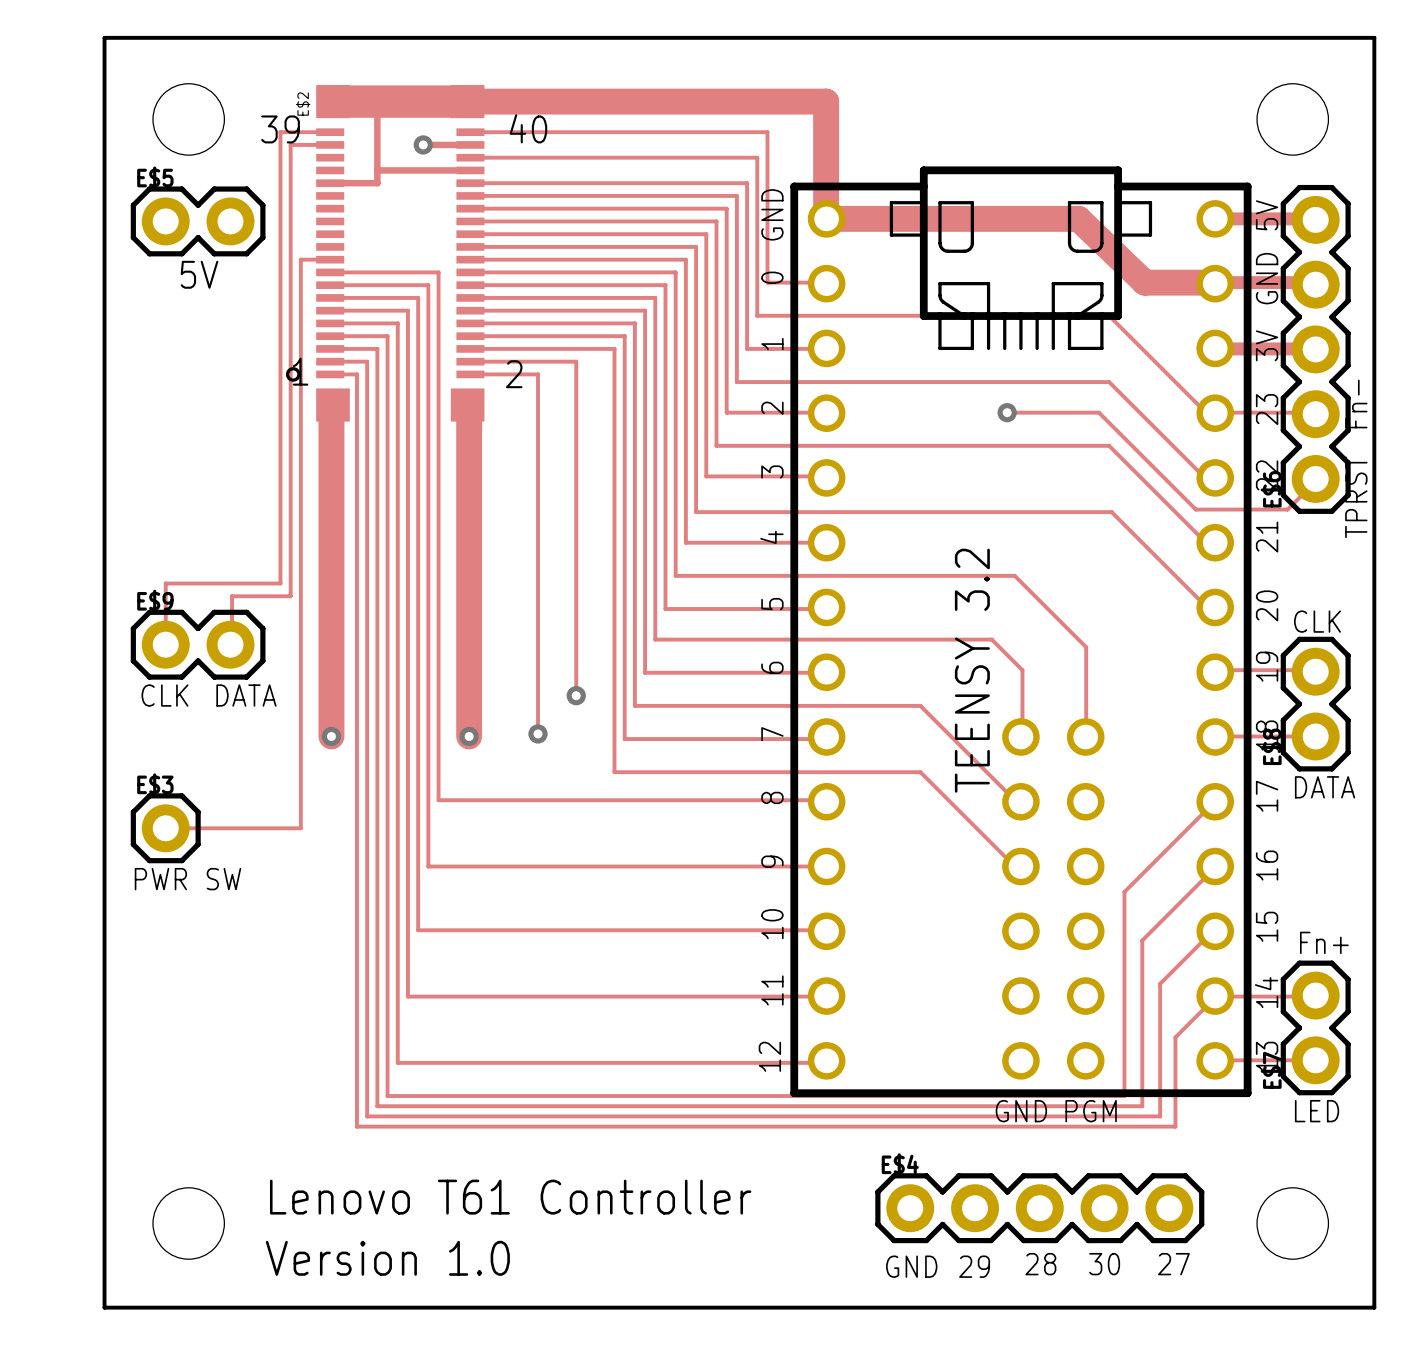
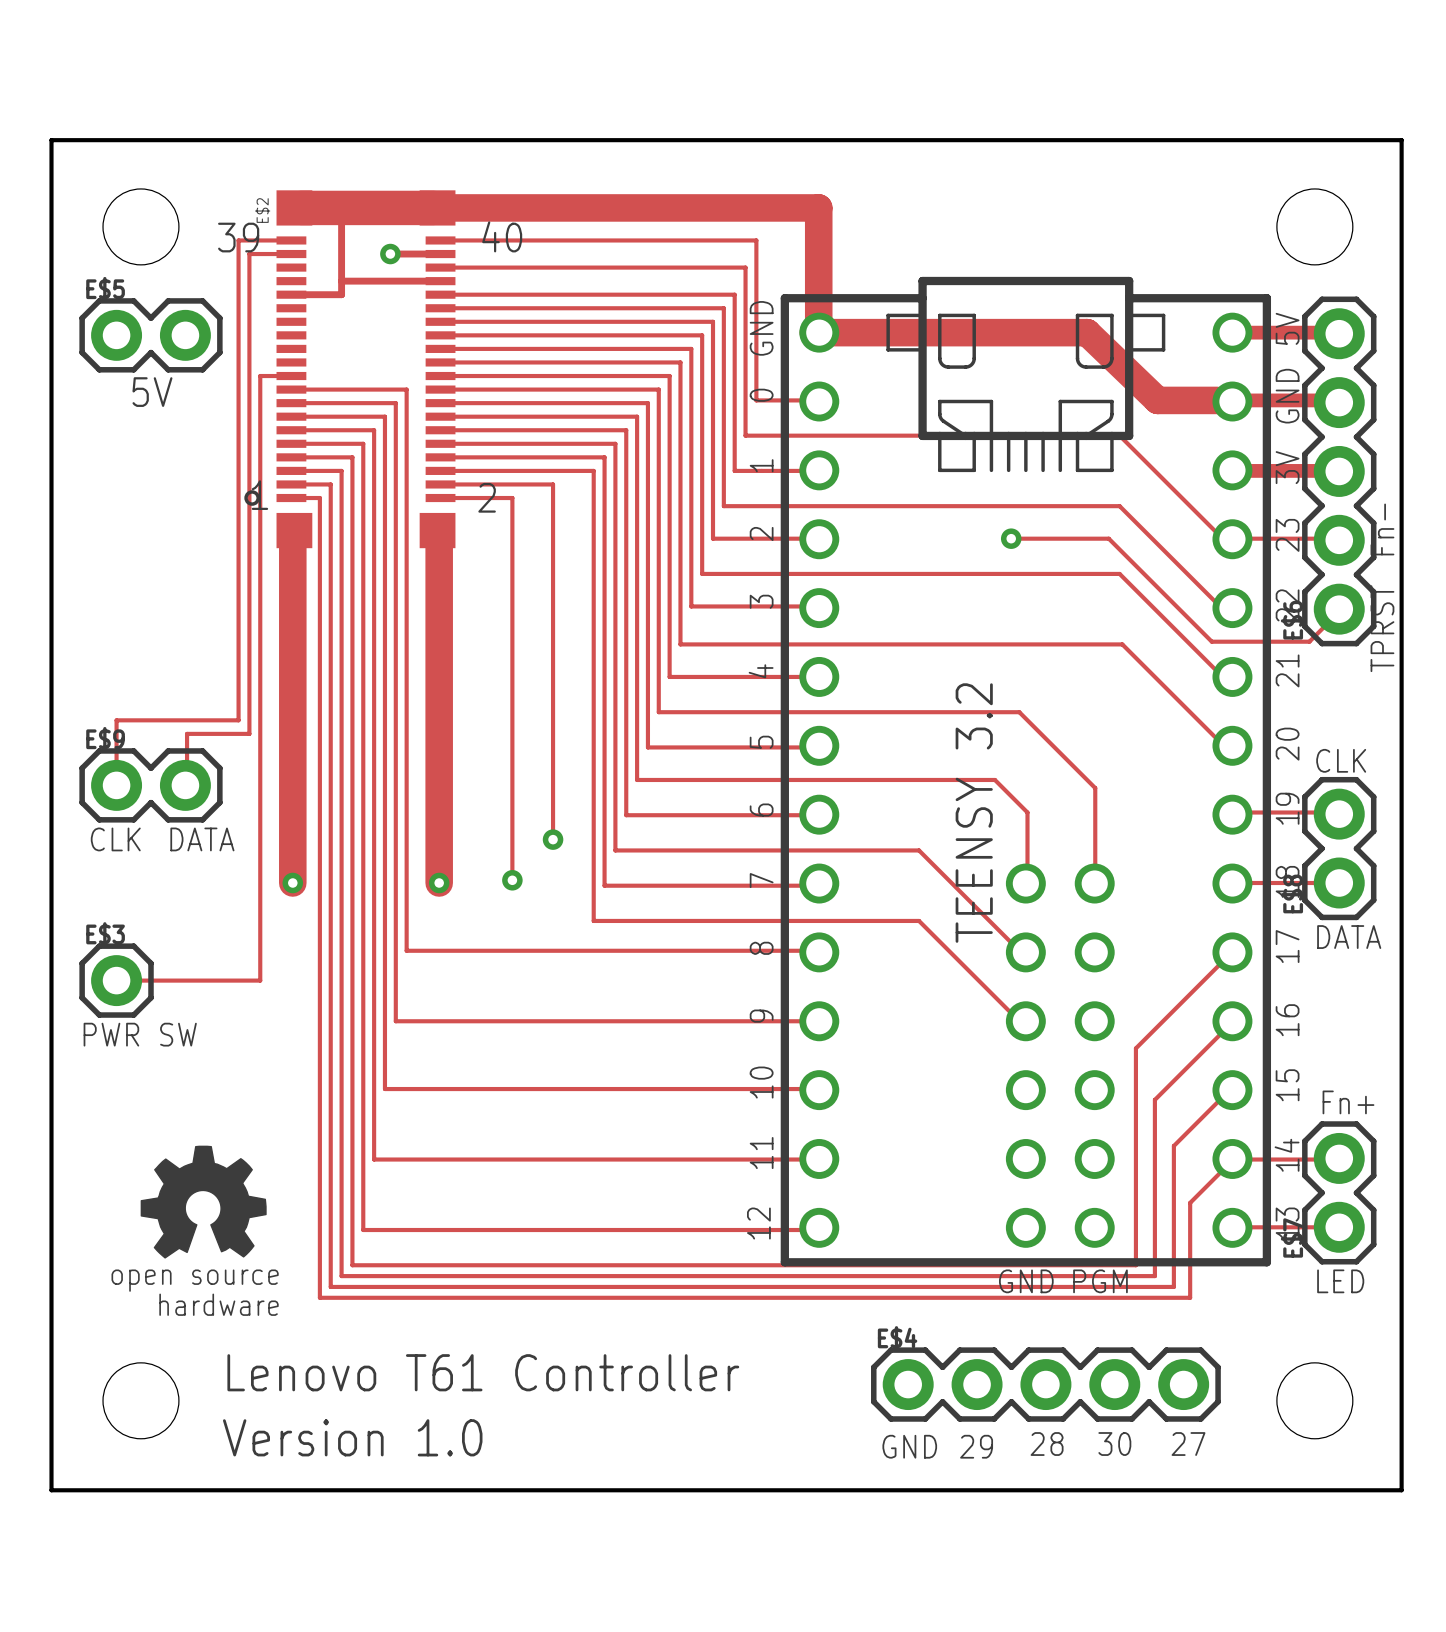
drawing: none -> [140, 1145, 267, 1259]

